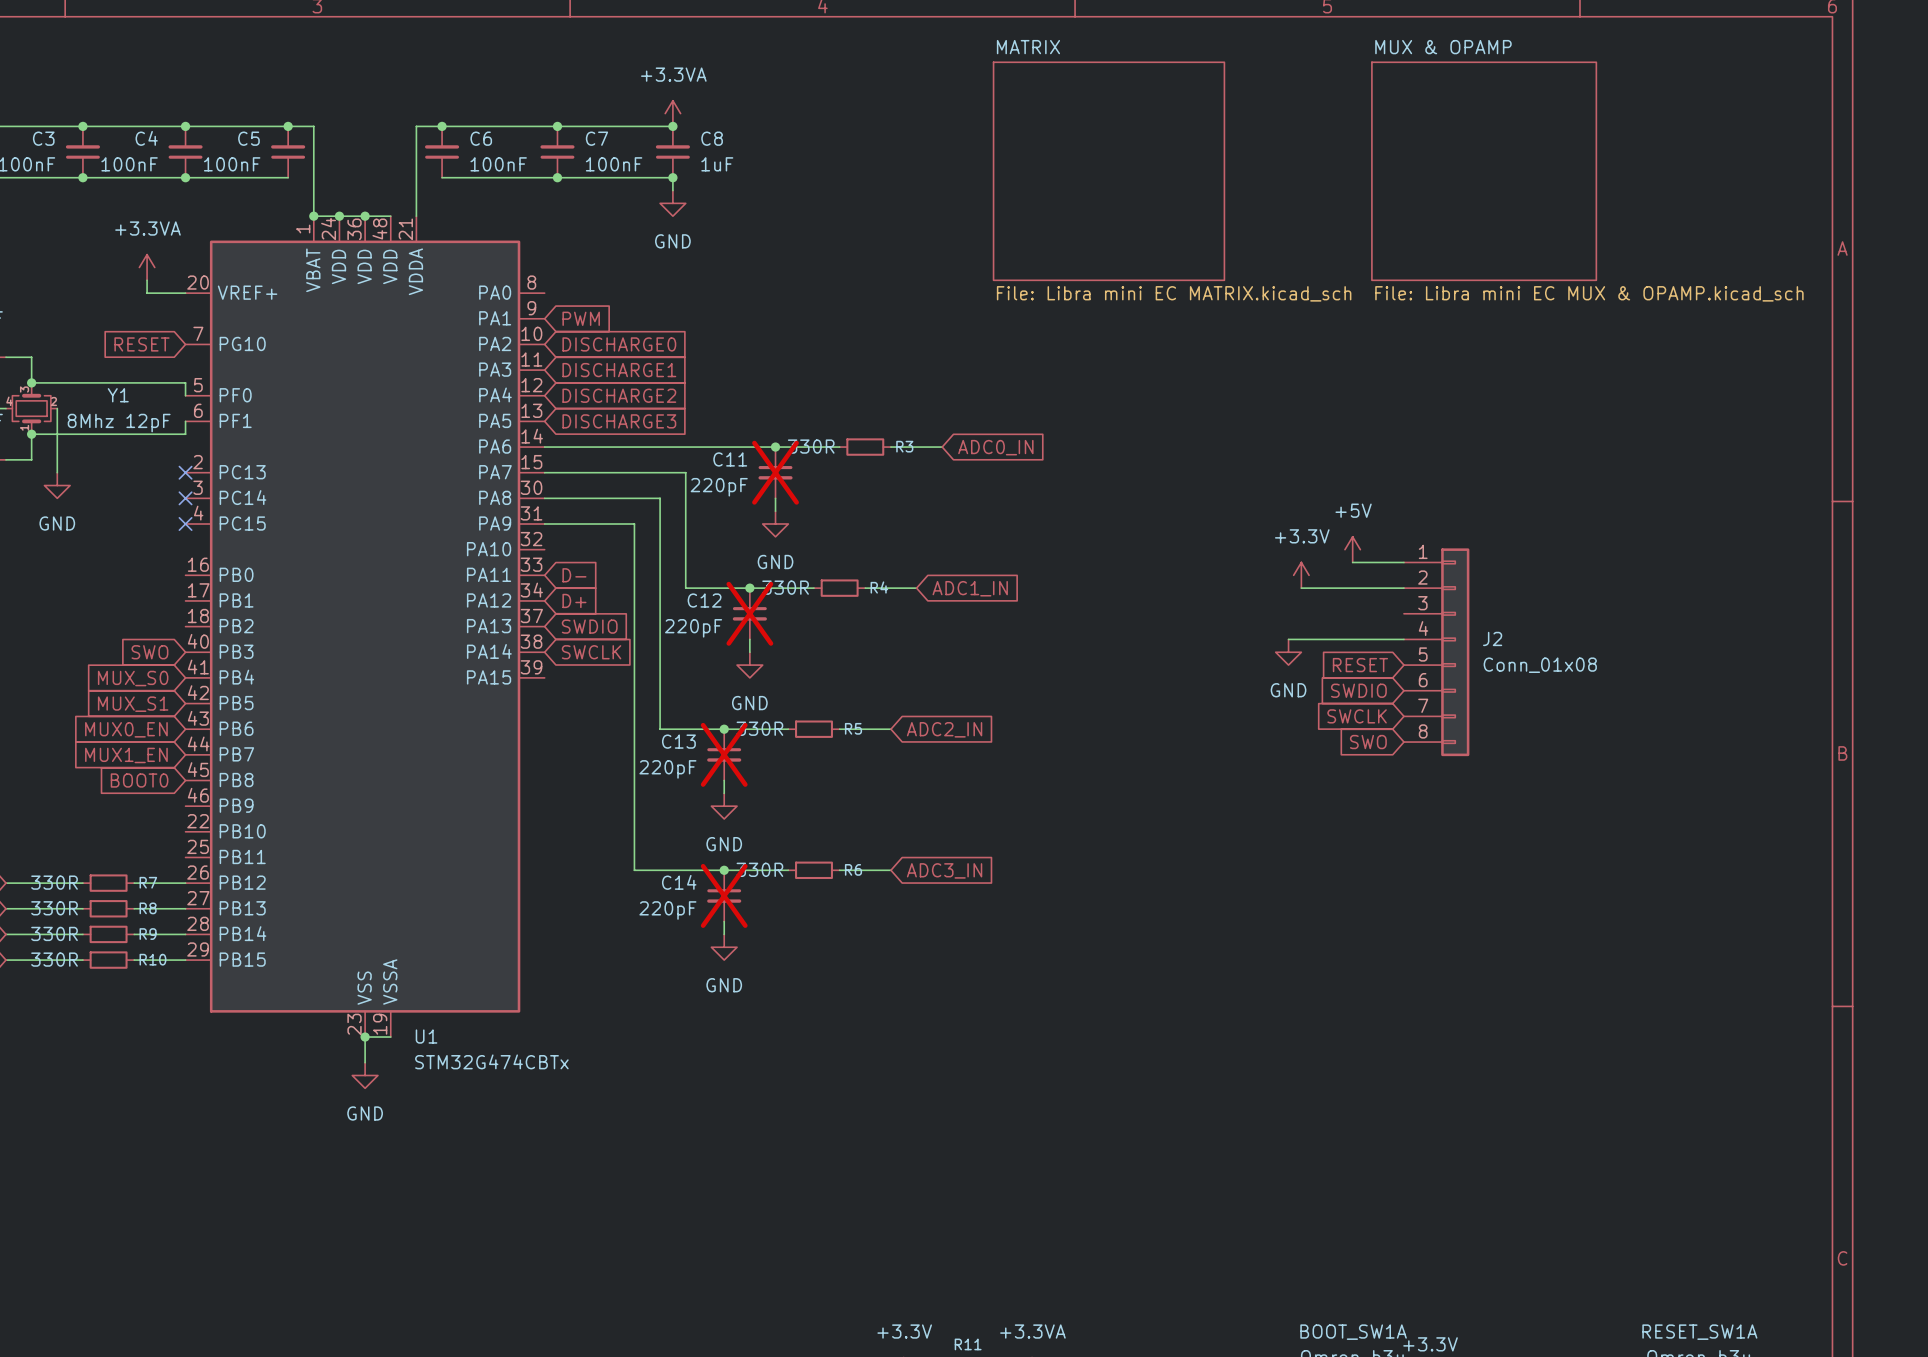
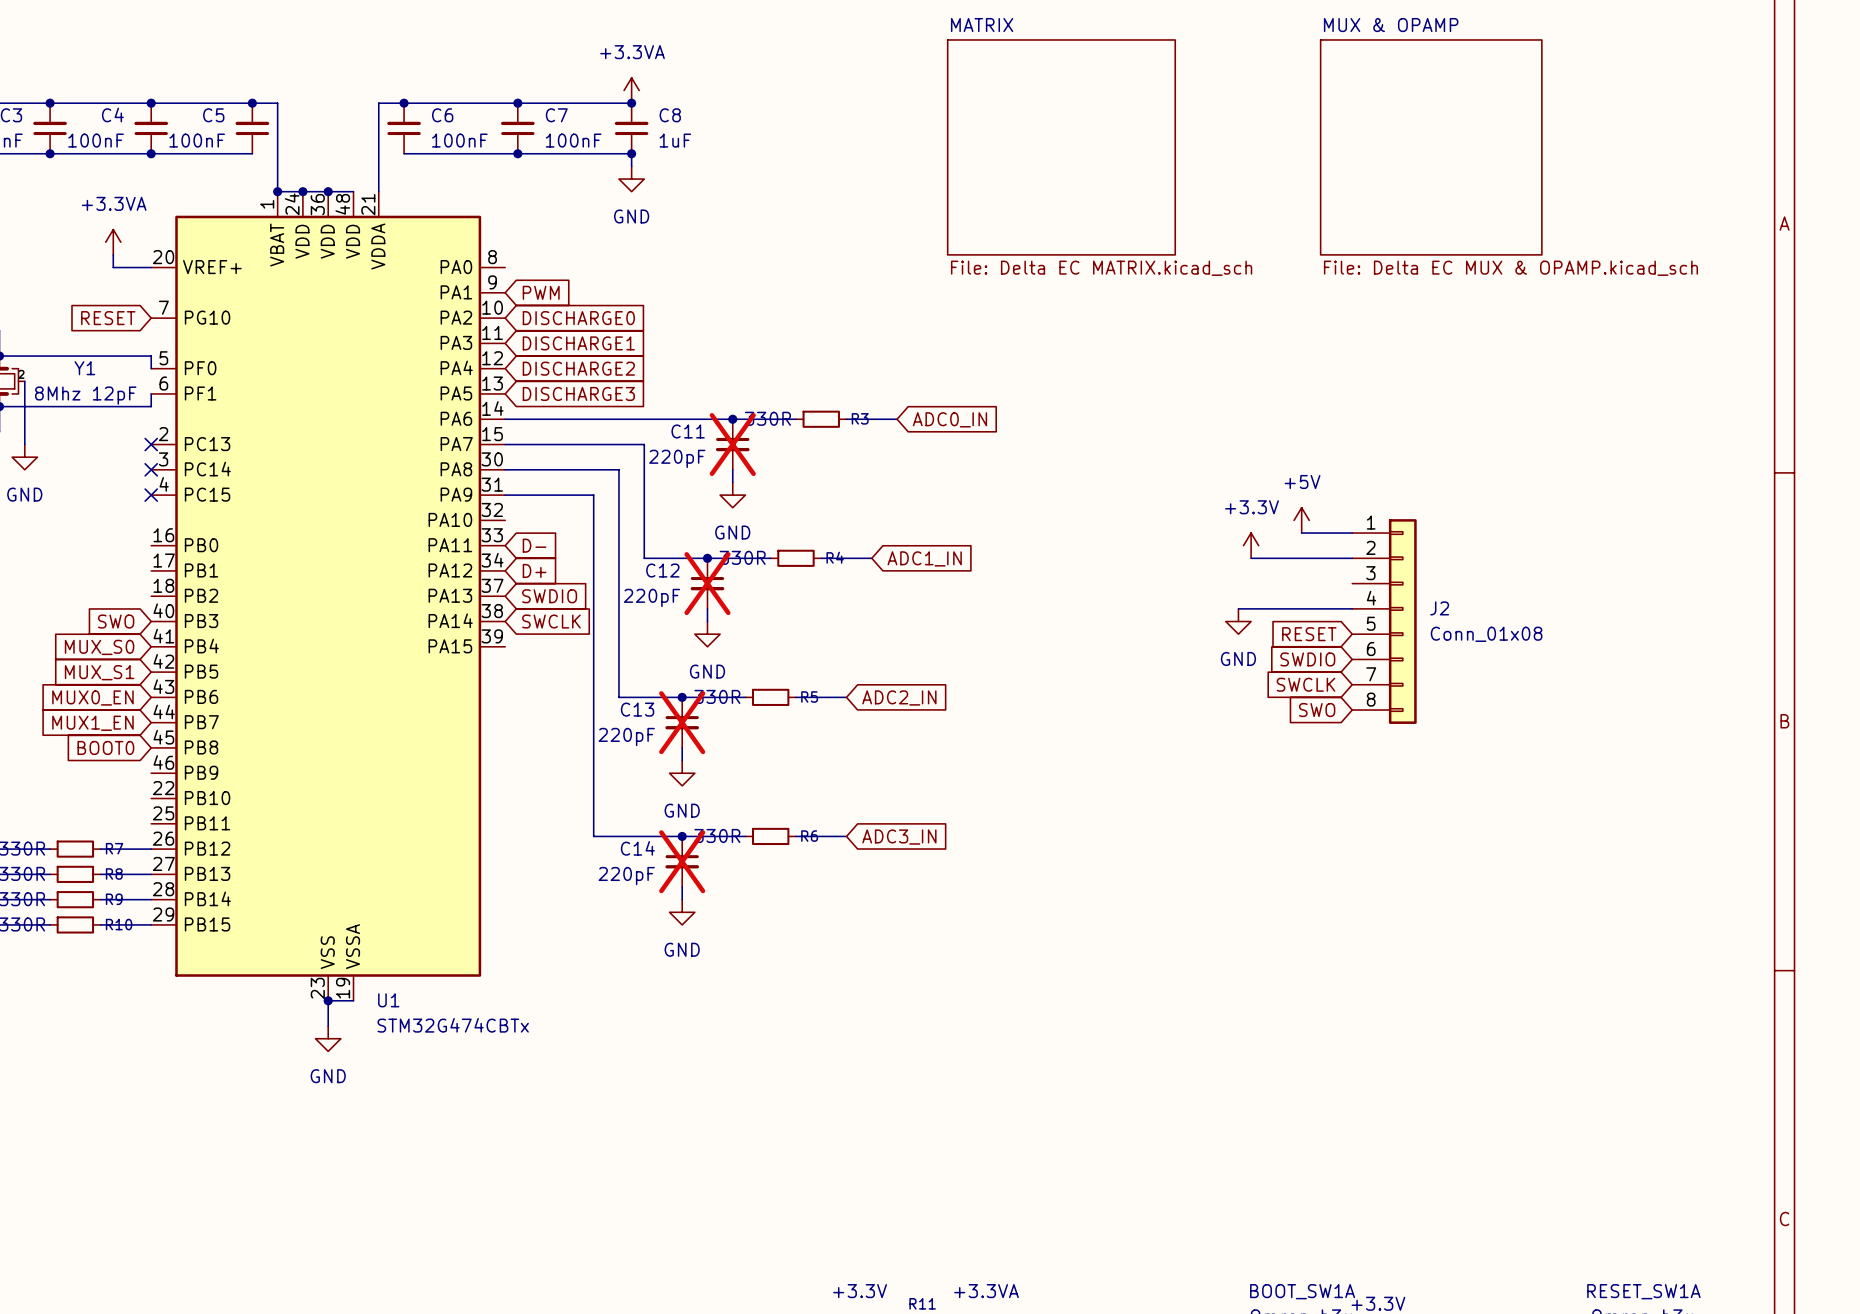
sheet MATRIX value: File: Libra mini EC MATRIX.kicad_sch (1174, 293) -> File: Delta EC MATRIX.kicad_sch (1101, 268)
sheet MUX & OPAMP value: File: Libra mini EC MUX & OPAMP.kicad_sch (1589, 293) -> File: Delta EC MUX & OPAMP.kicad_sch (1510, 268)

